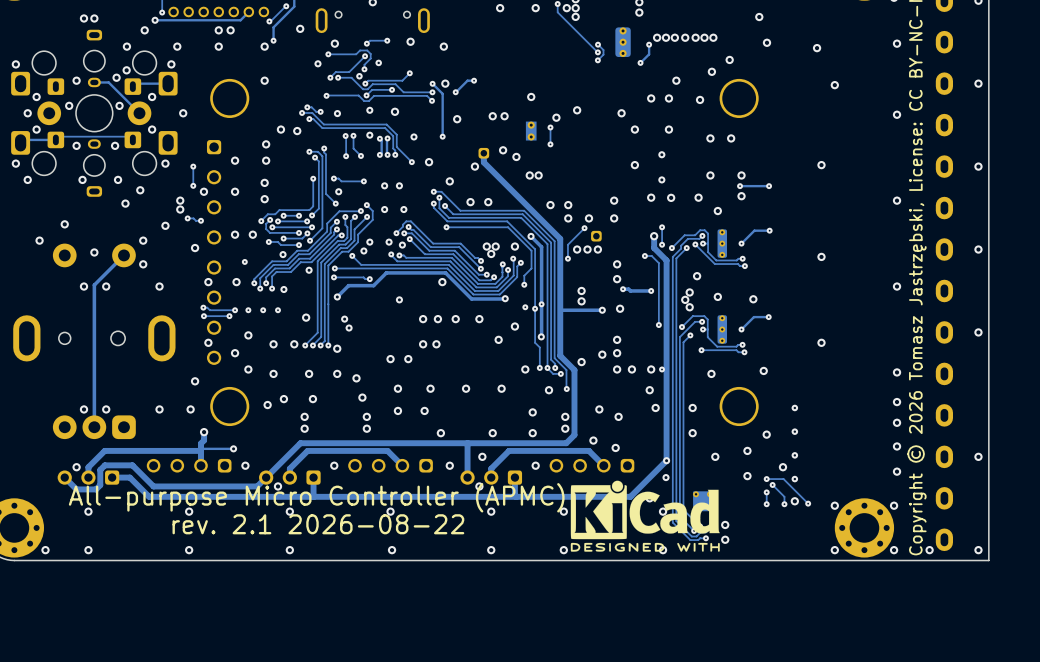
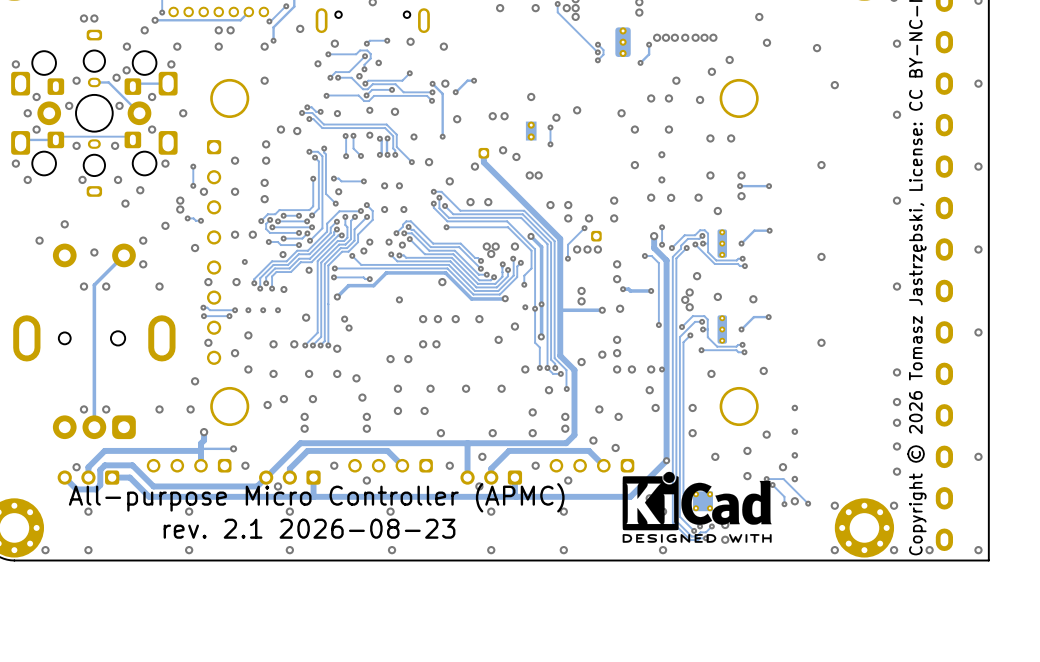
via: none -> (366, 480)
via: none -> (568, 480)
drawing position: (645, 516) -> (697, 507)
text: rev. 2.1 2026-08-22 (318, 524) -> rev. 2.1 2026-08-23 (309, 528)

